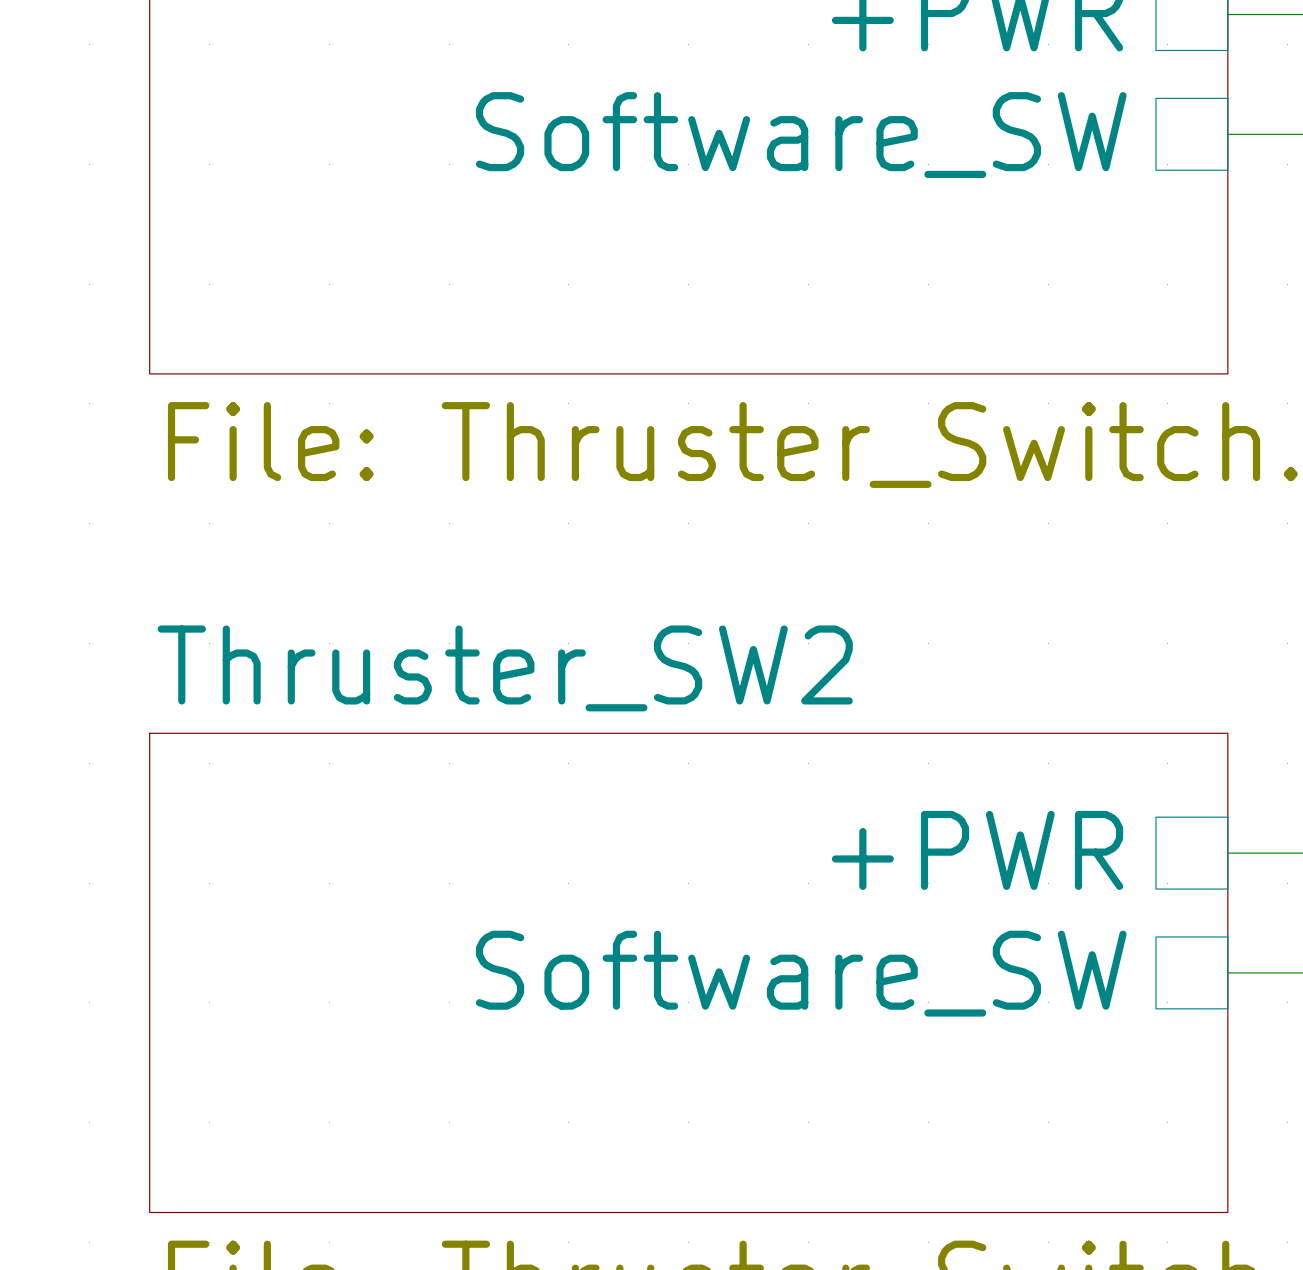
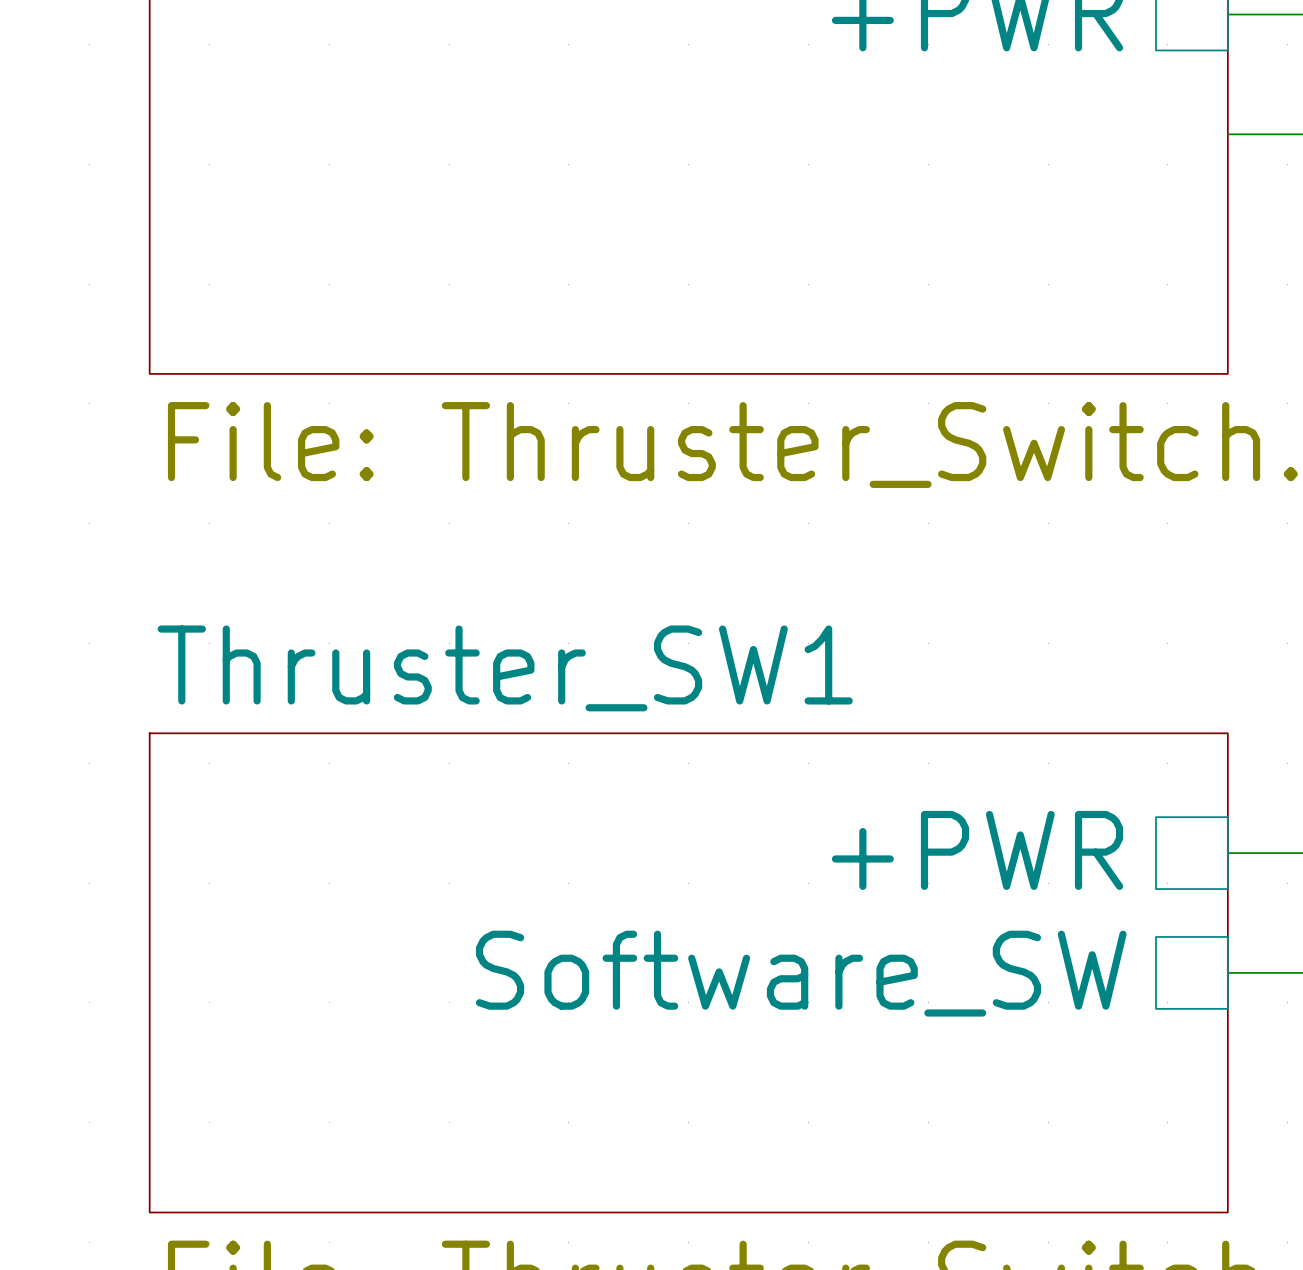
sheet pin: Software_SW (801, 135) -> none
sheet Thruster_SW2 name: Thruster_SW2 (505, 668) -> Thruster_SW1 (505, 668)

